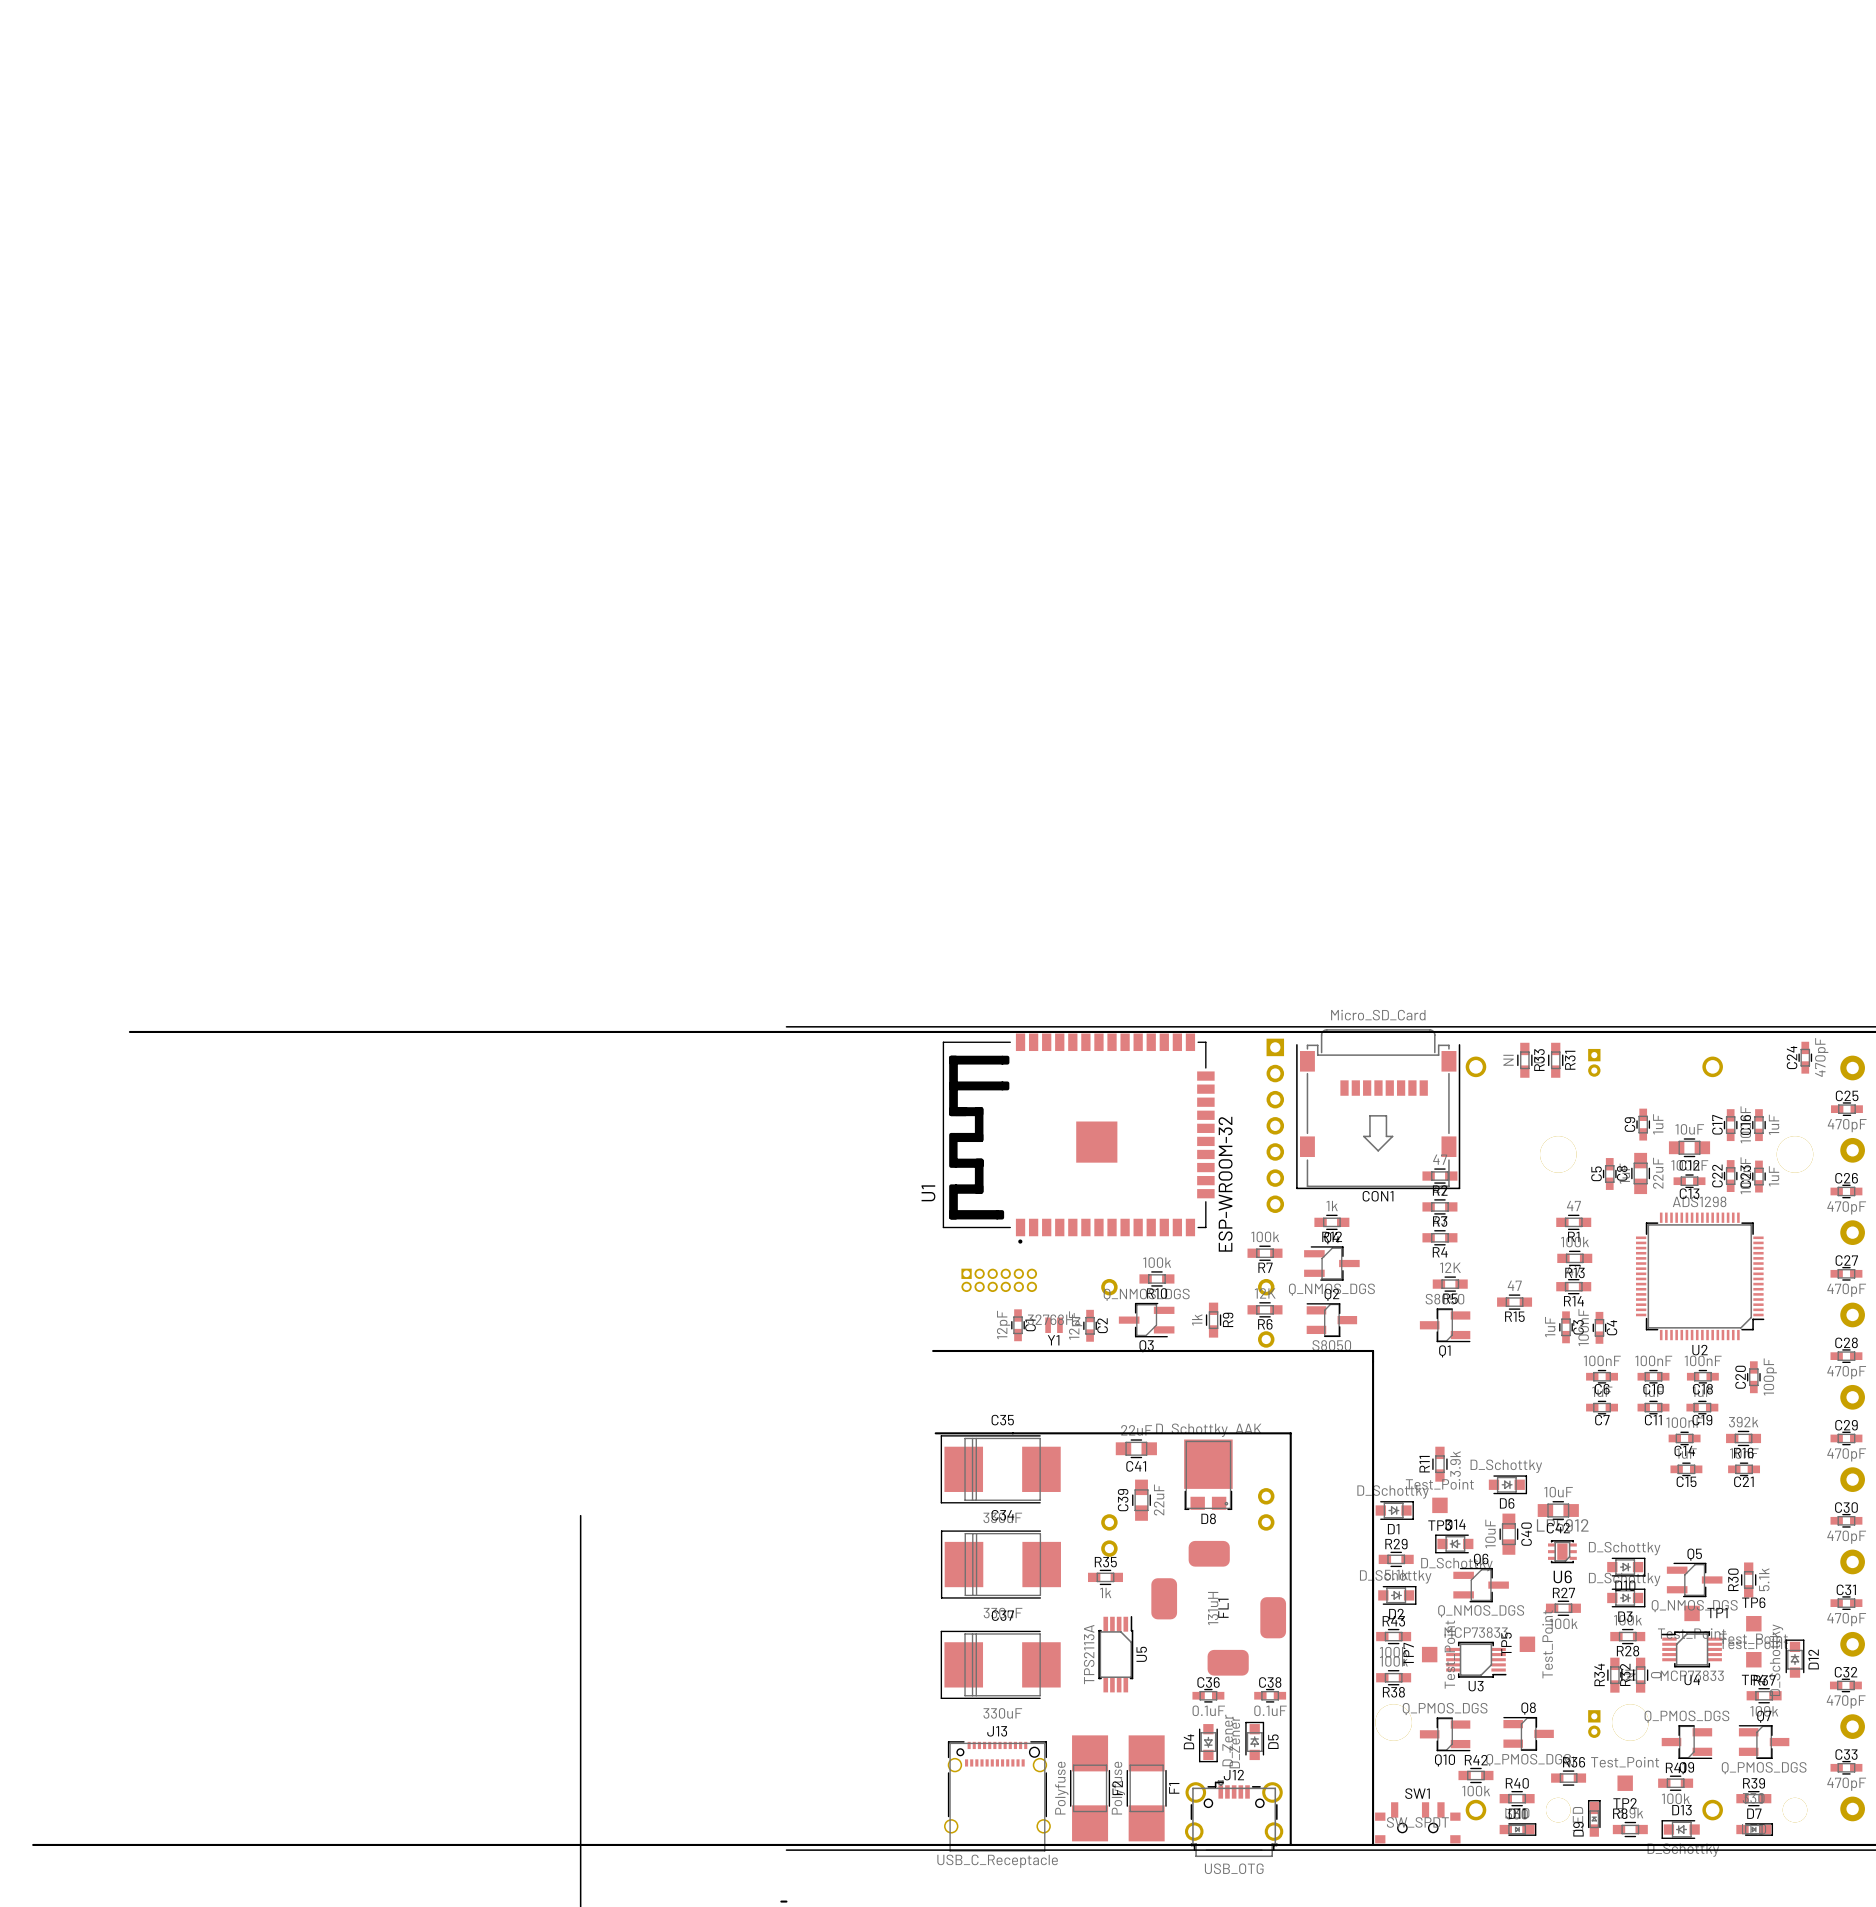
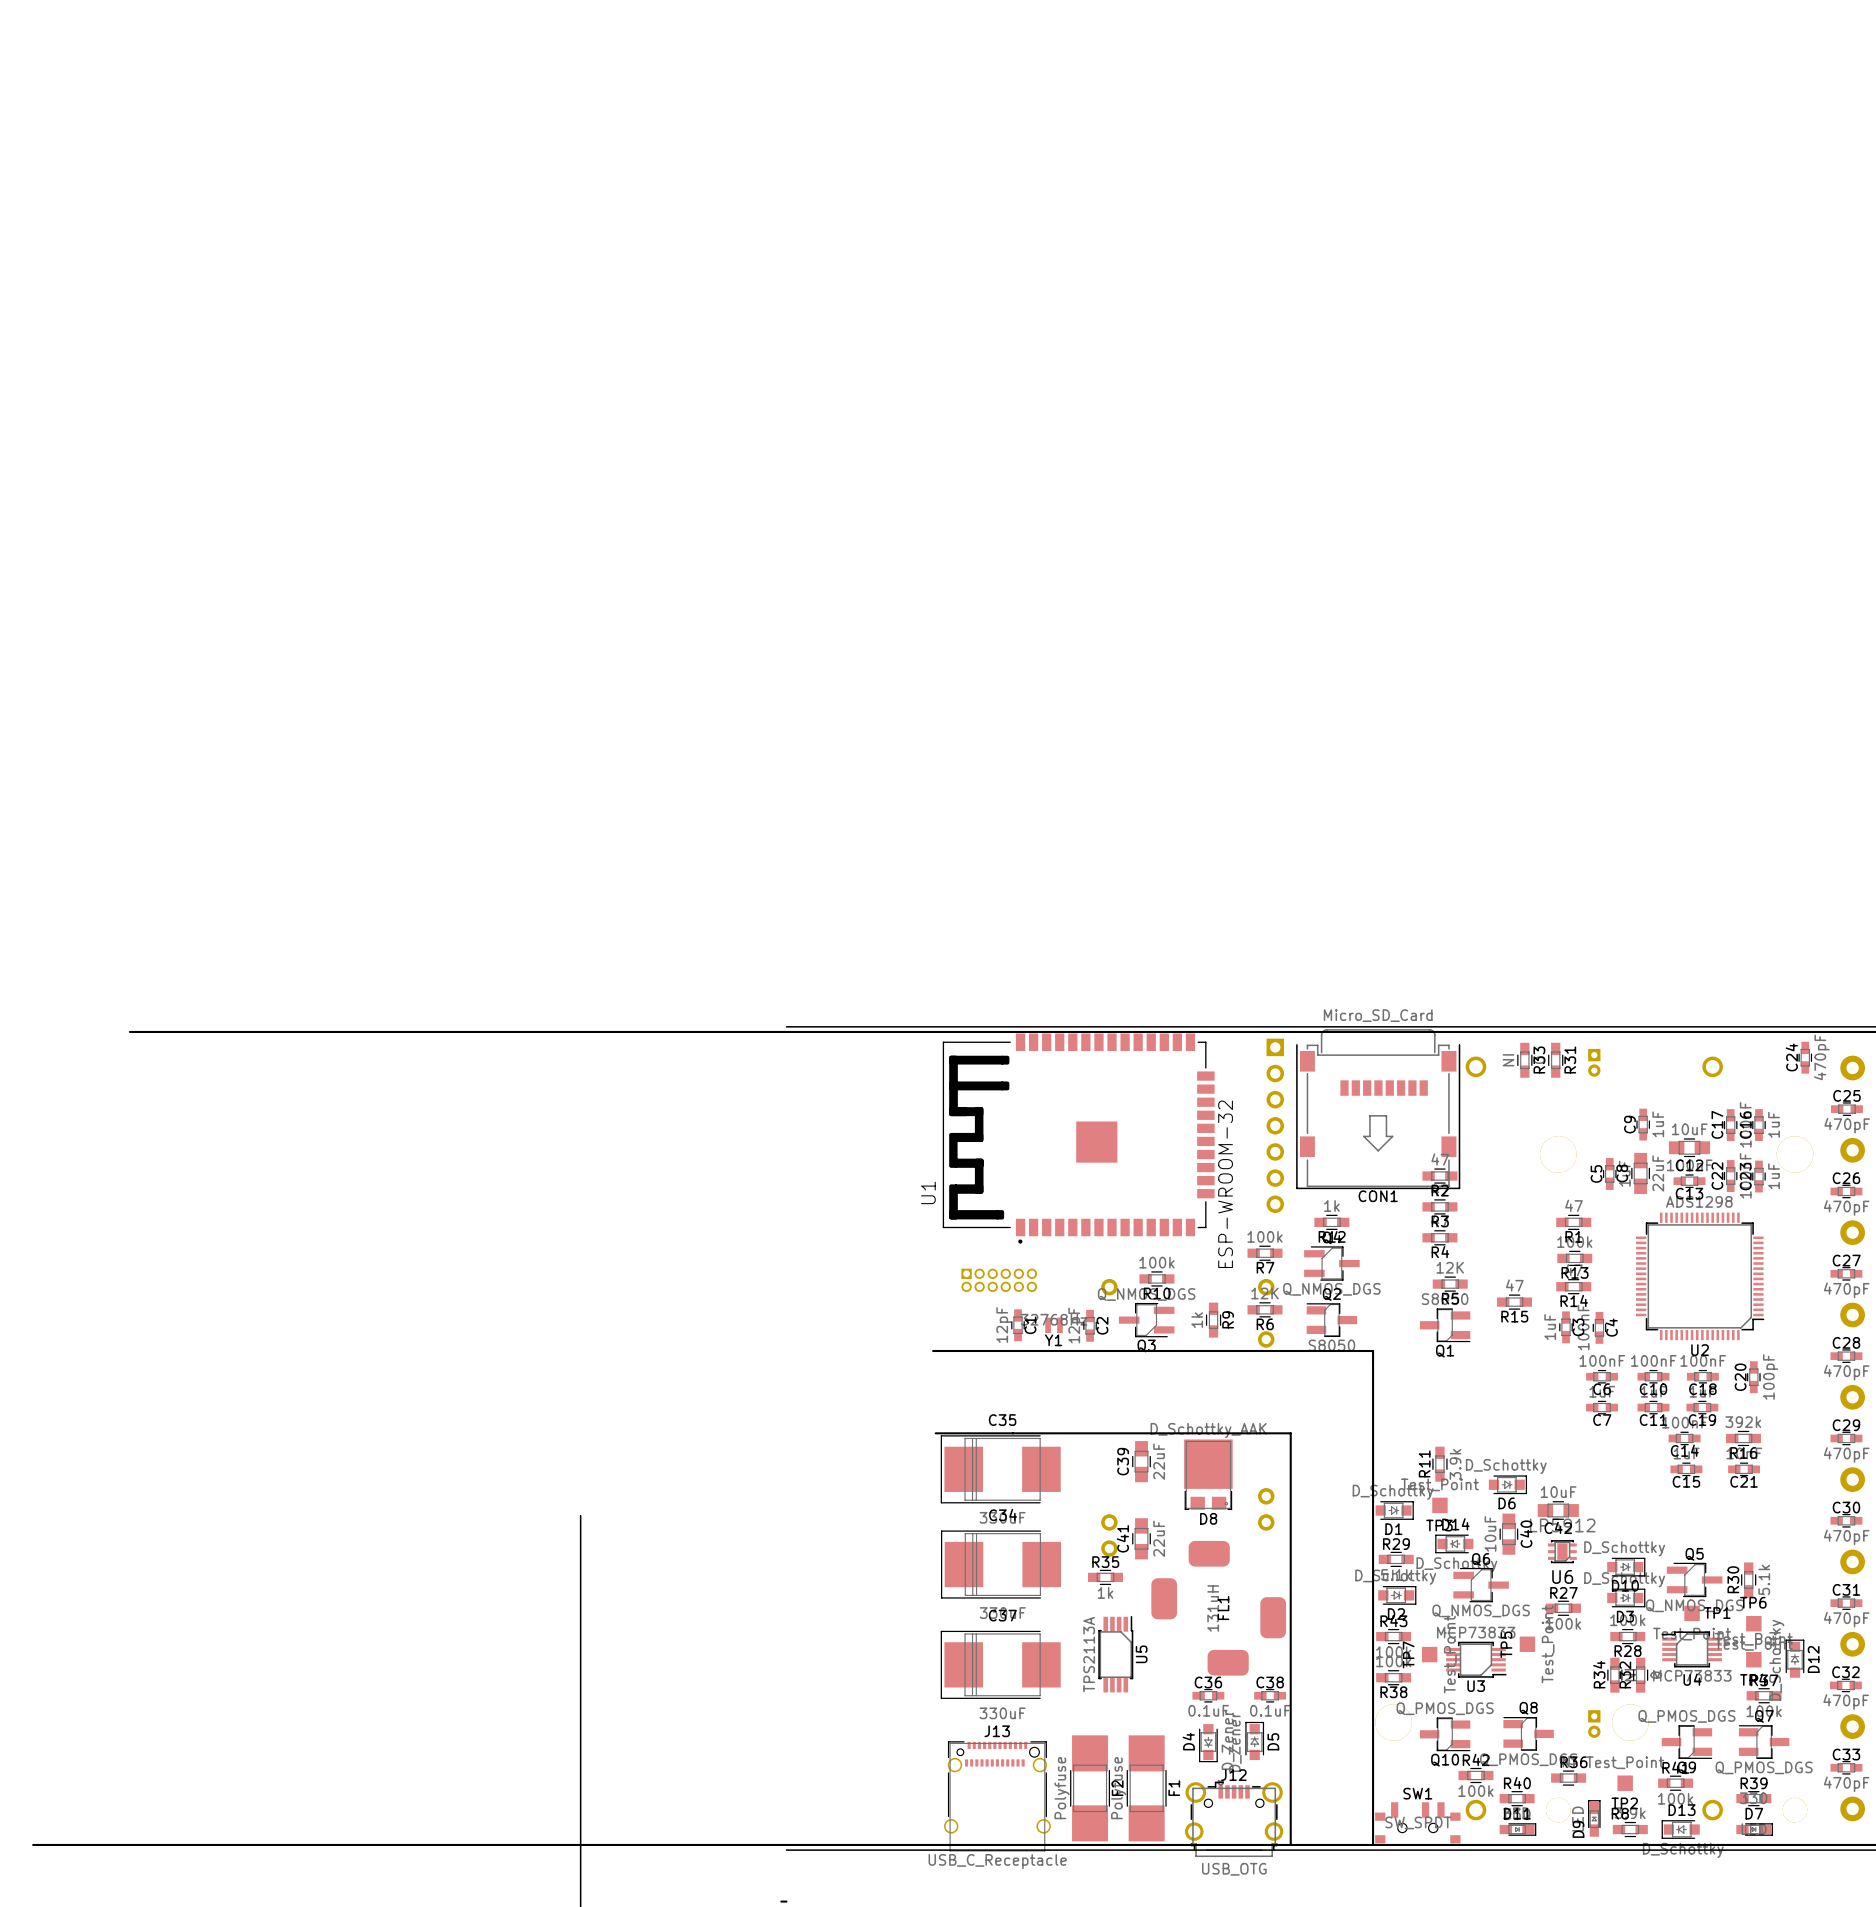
C41 rotation: 0° (1136, 1448) -> 90° clockwise (1141, 1538)
C41 position: (1136, 1448) -> (1141, 1538)
C39 position: (1141, 1500) -> (1141, 1461)

